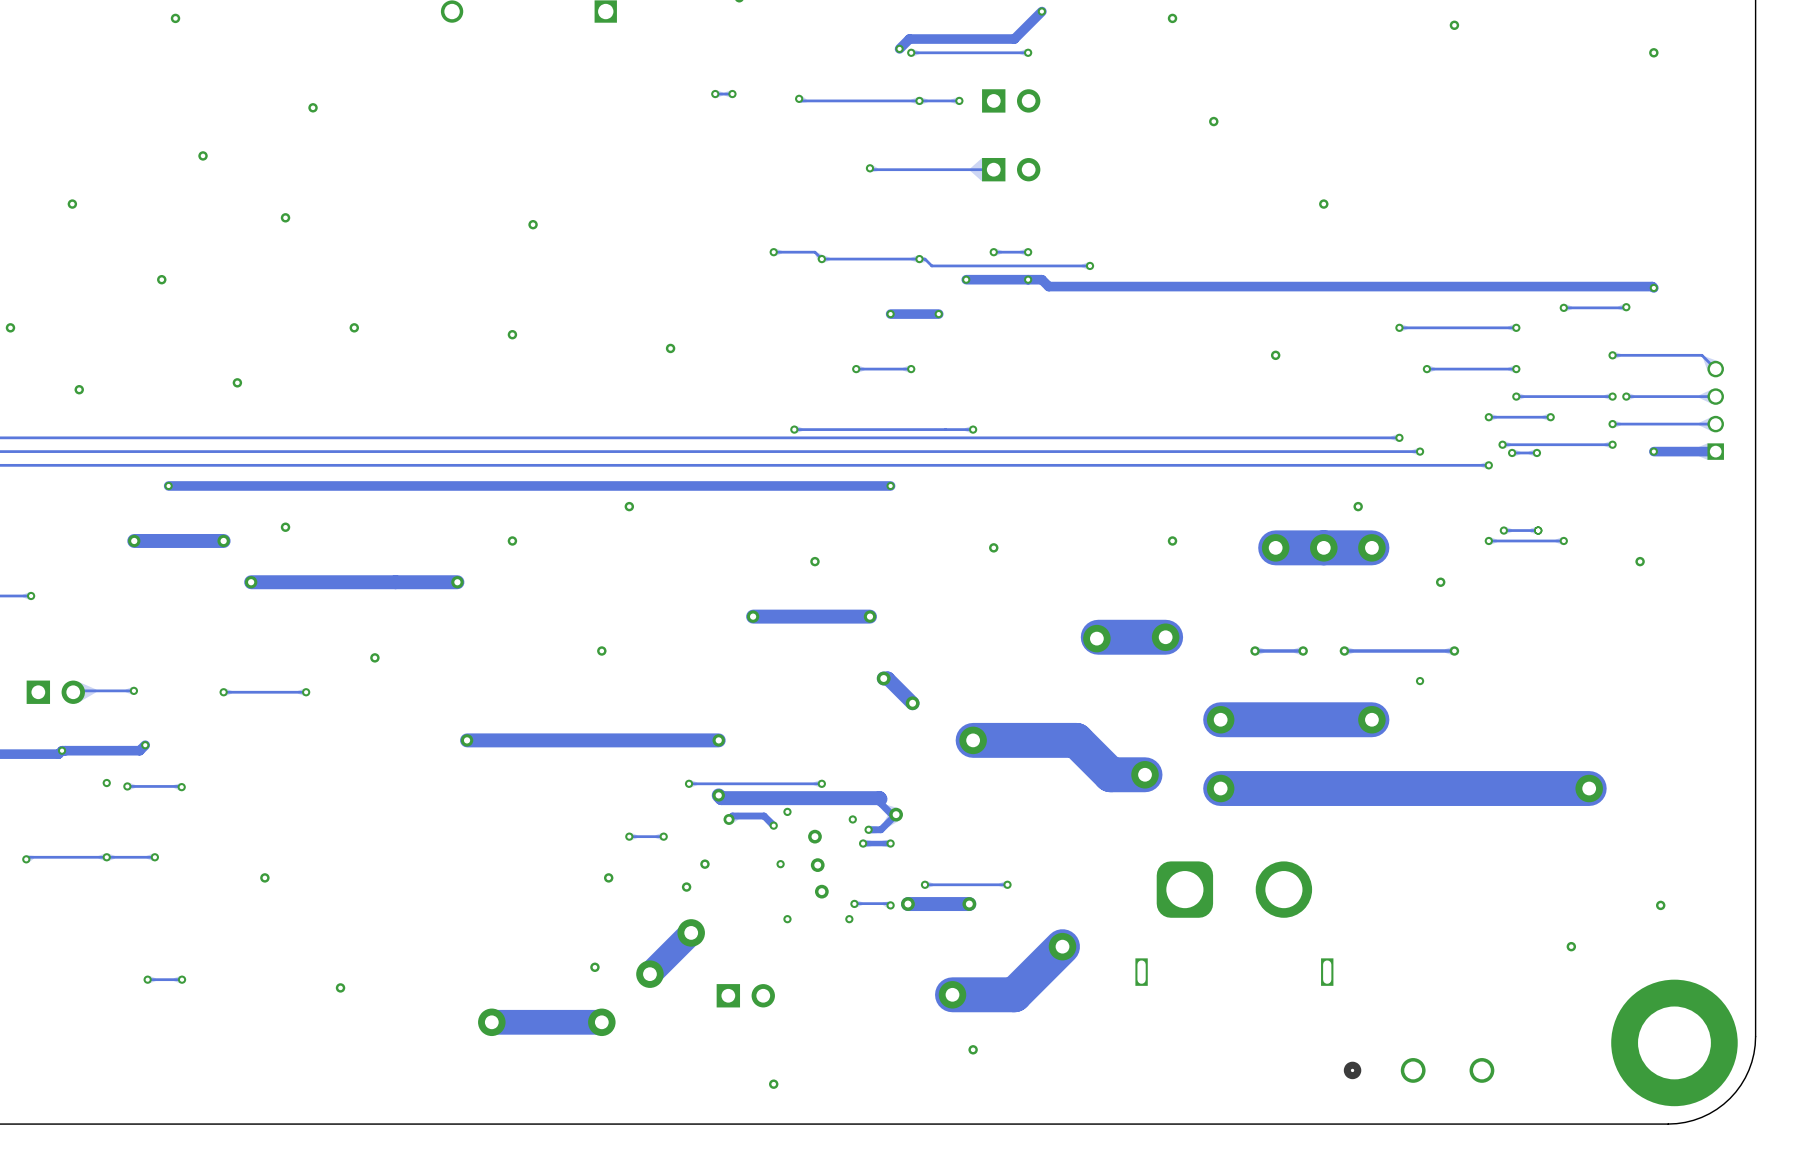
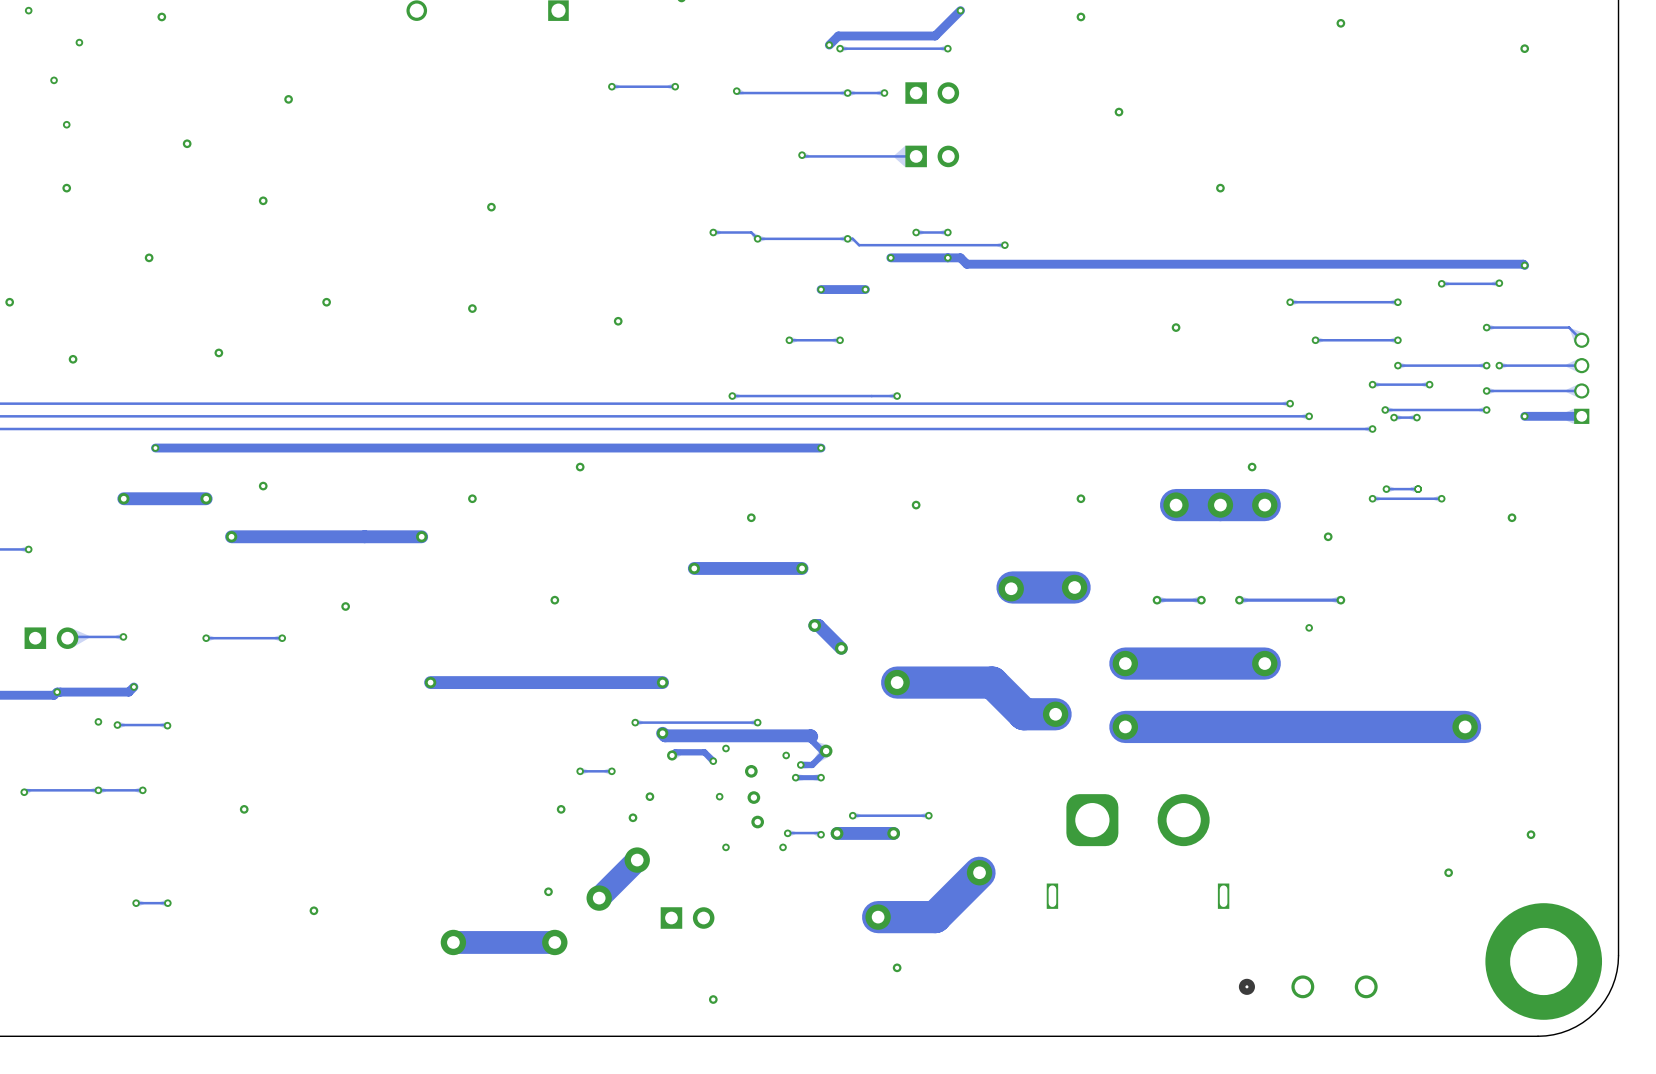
via: none -> (28, 10)
via: none -> (79, 42)
via: none -> (54, 80)
via position: (715, 94) -> (611, 86)
via: none -> (66, 124)

